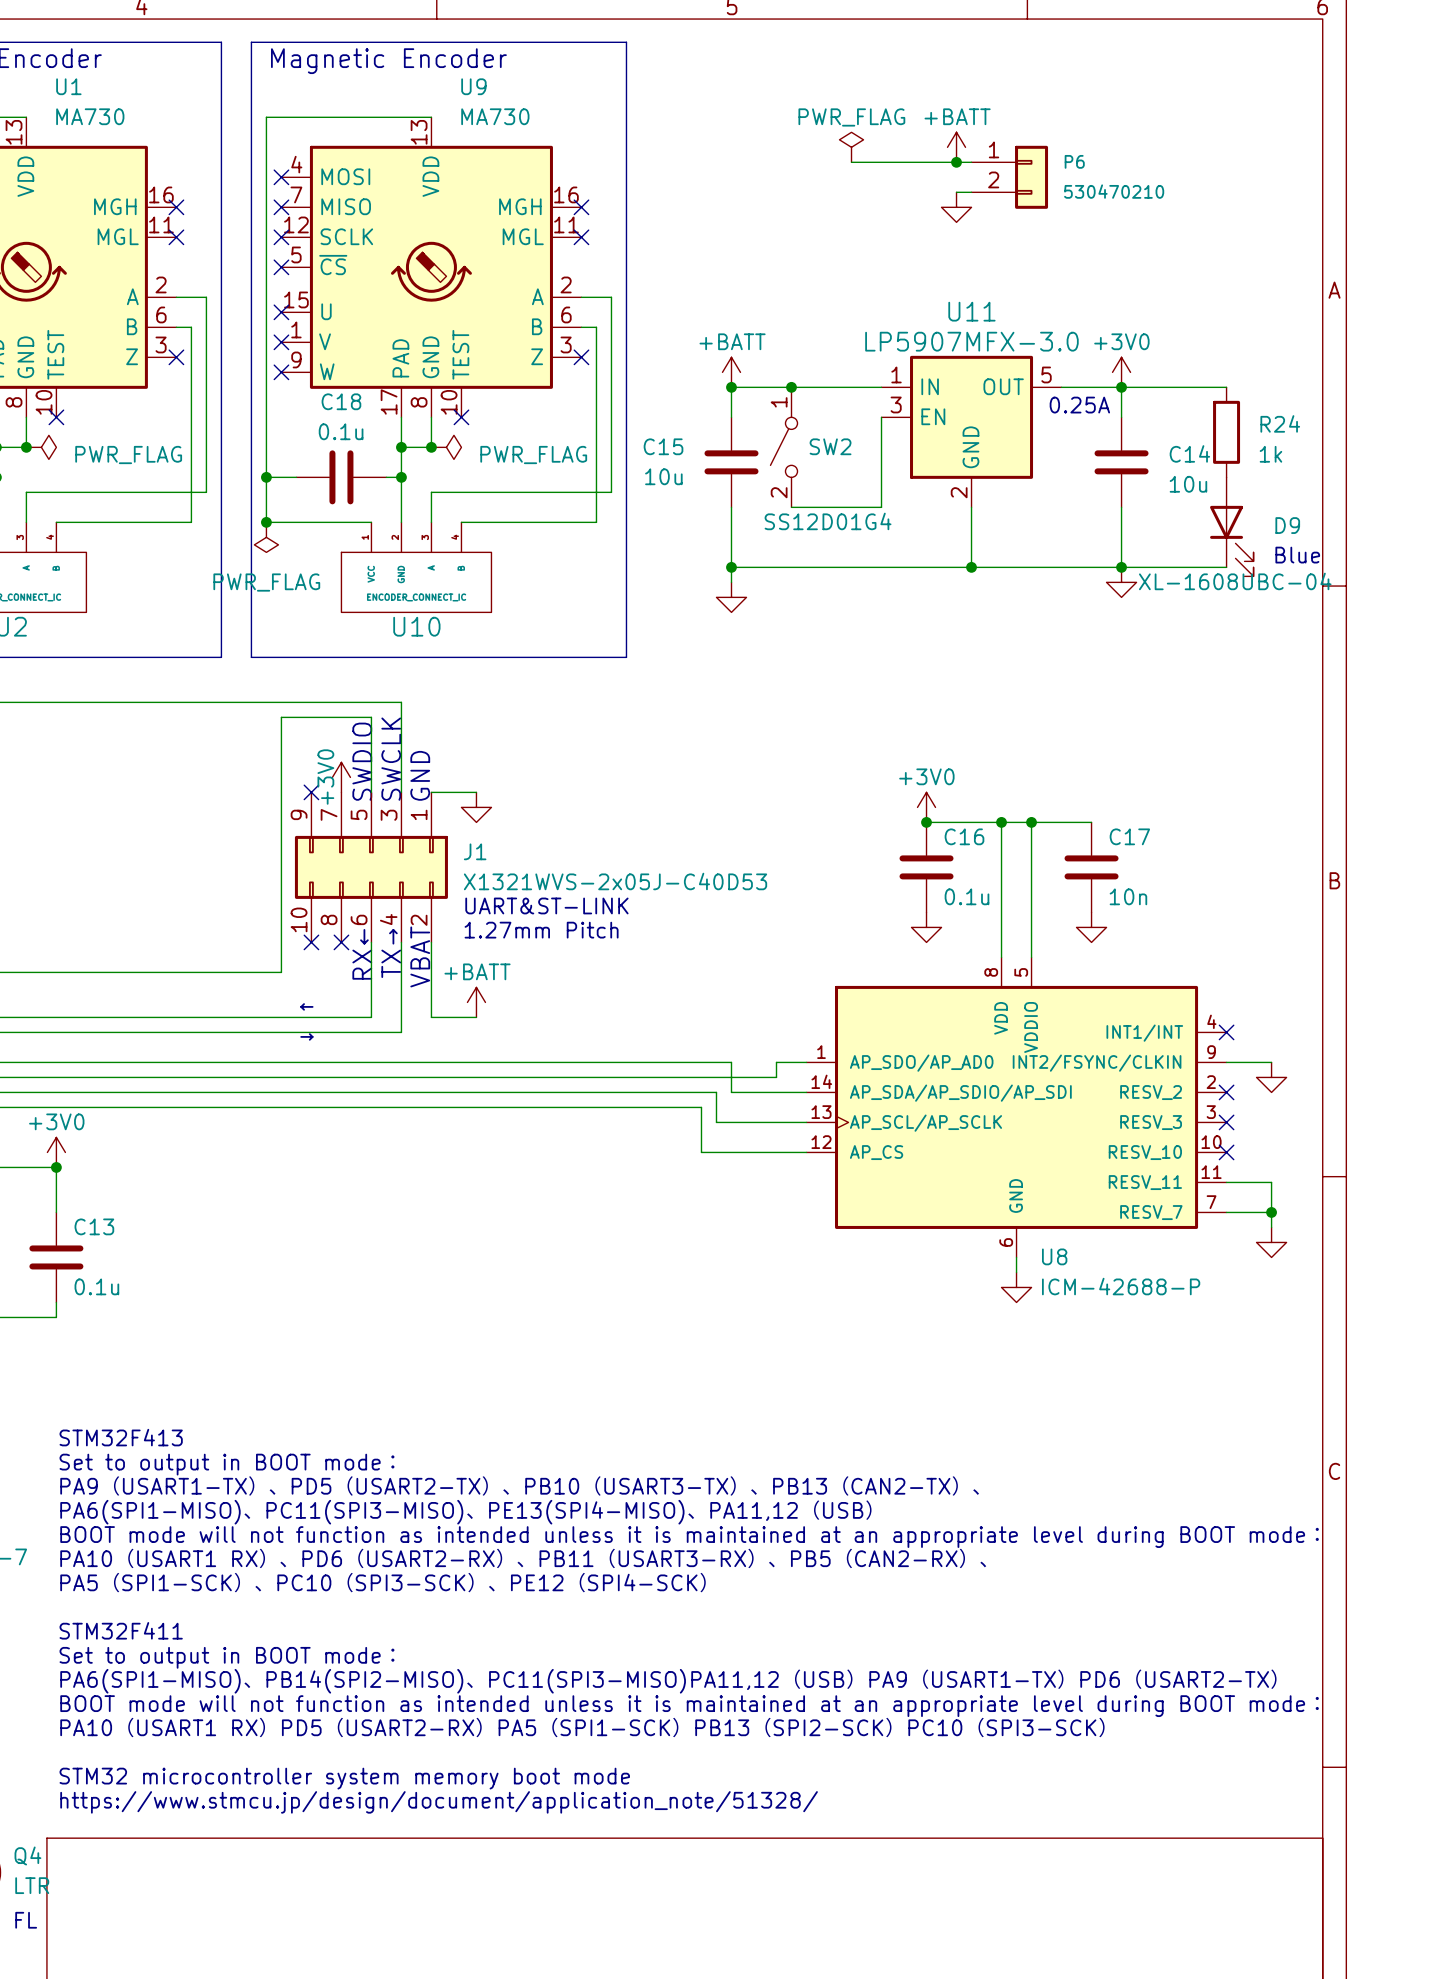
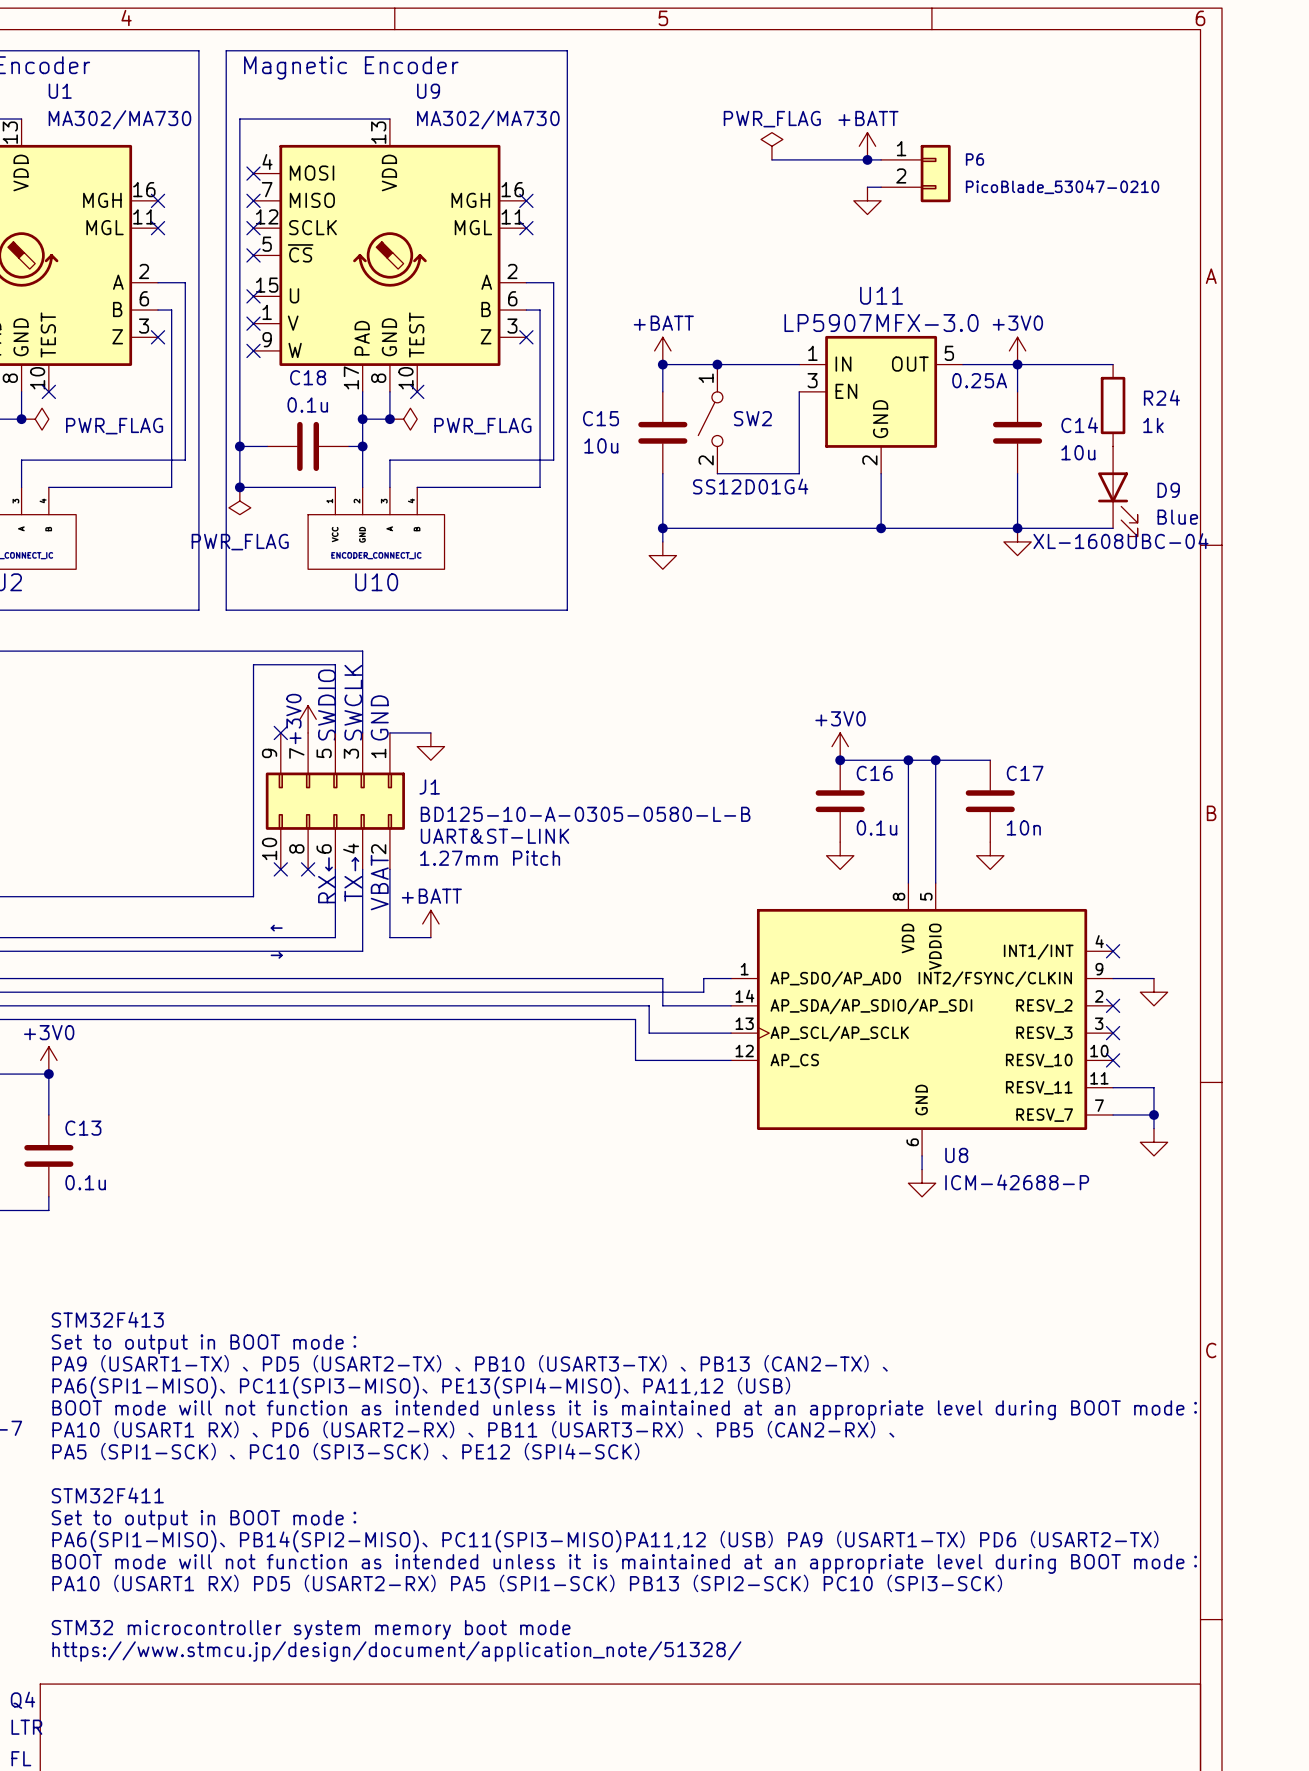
U1 value: MA730 (90, 116) -> MA302/MA730 (119, 119)
U9 value: MA730 (495, 116) -> MA302/MA730 (488, 119)
P6 value: 530470210 (1114, 191) -> PicoBlade_53047-0210 (1062, 187)
J1 value: X1321WVS-2x05J-C40D53 (615, 881) -> BD125-10-A-0305-0580-L-B (585, 814)

